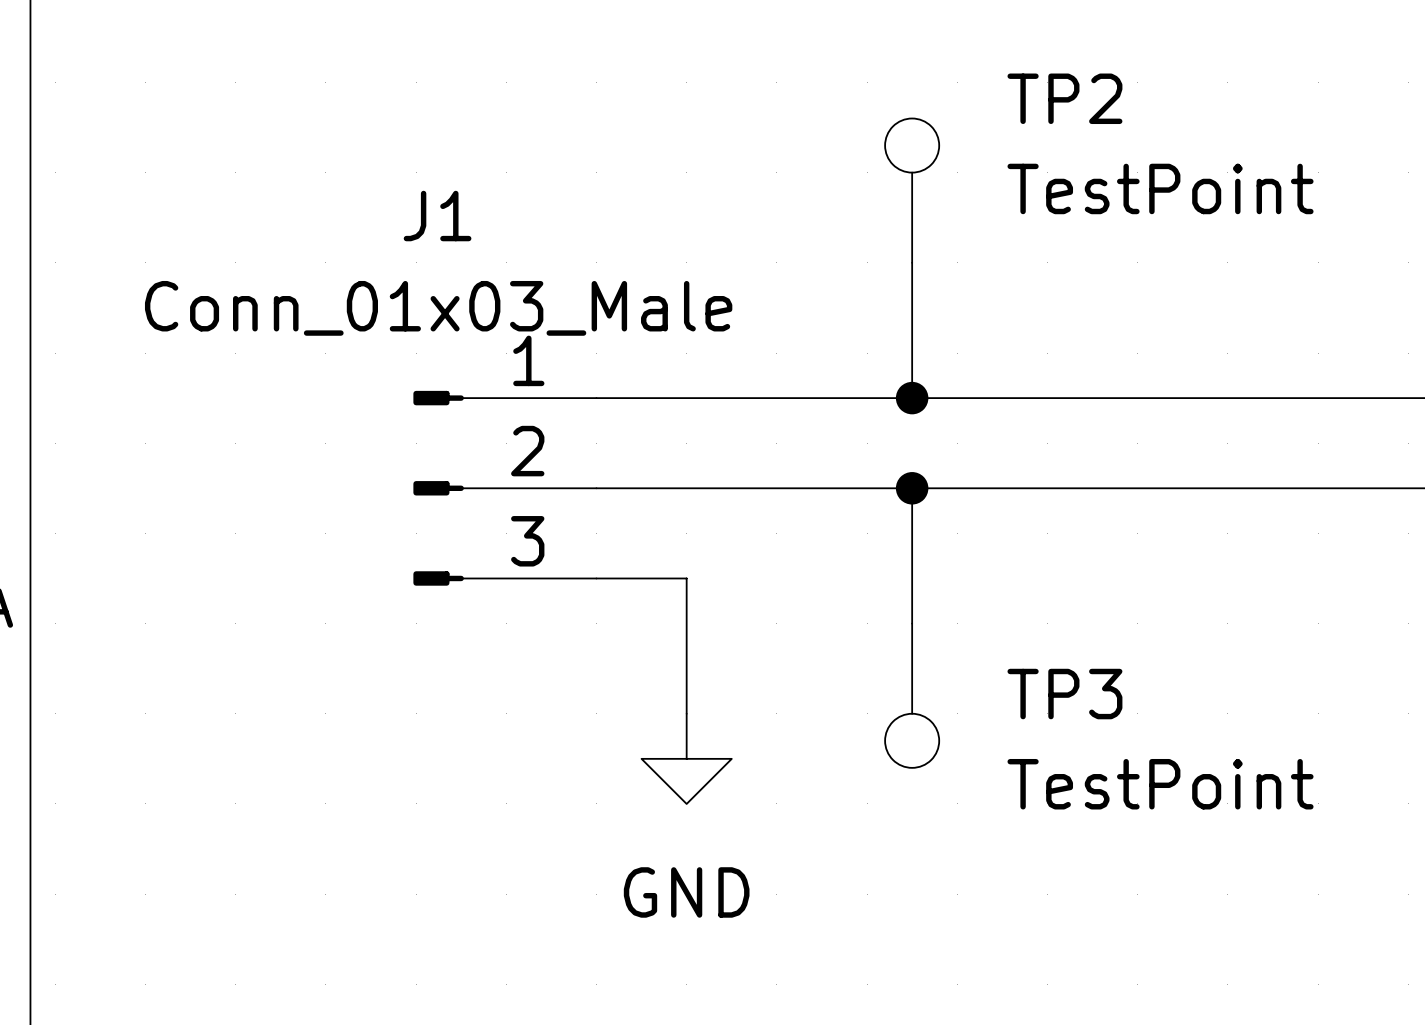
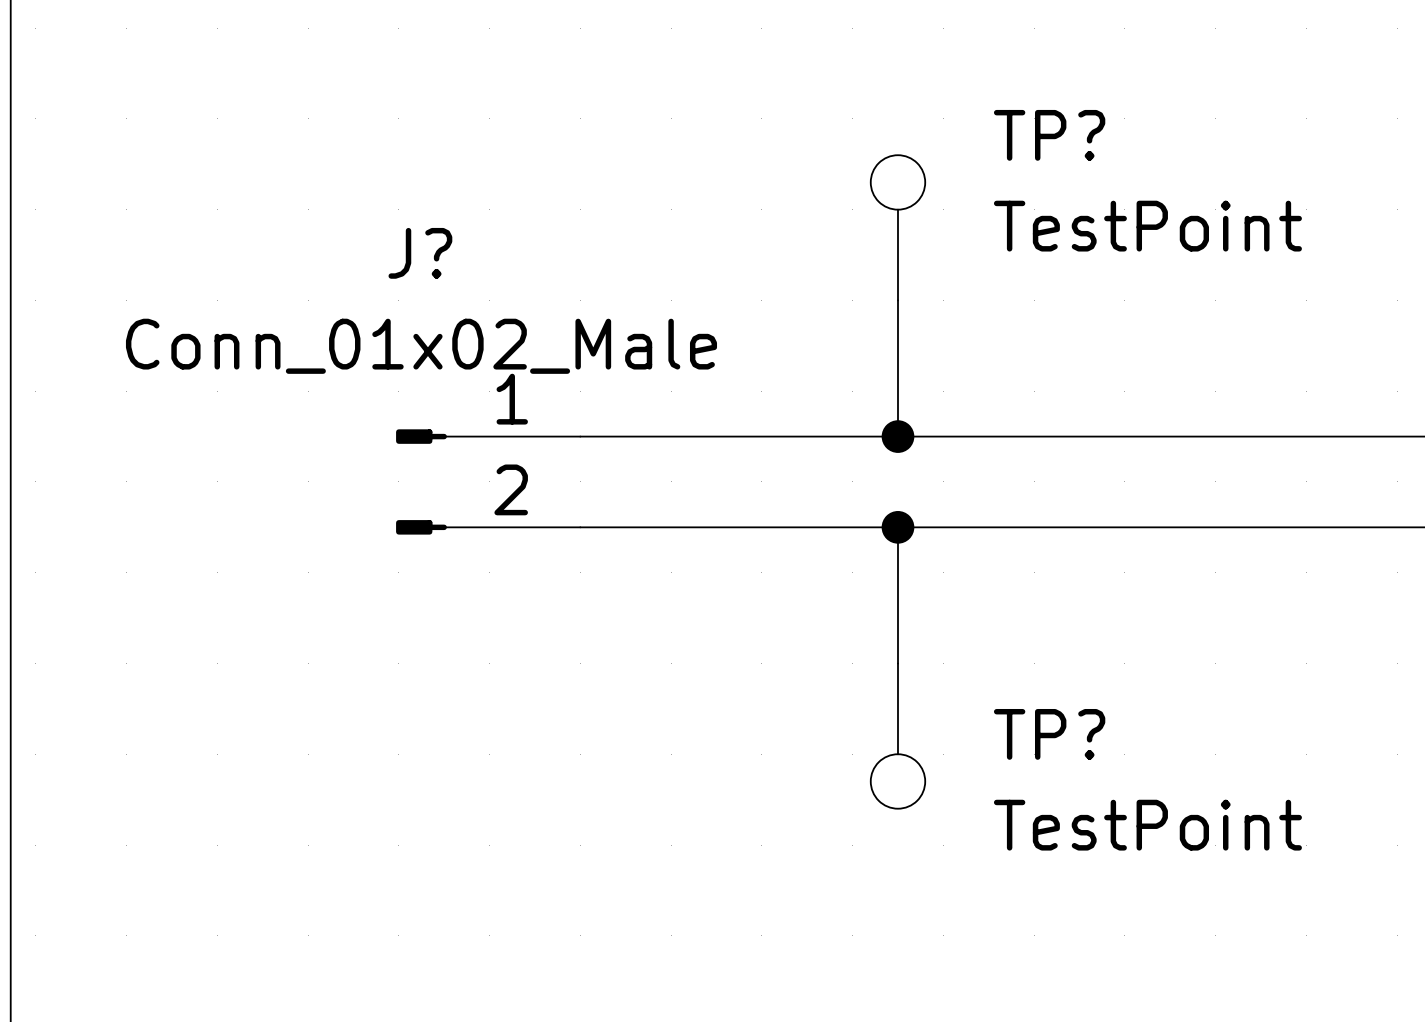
TP2 name: TP2 (1064, 98) -> TP? (1049, 135)
J?: none -> Conn_01x02_Male (488, 481)
J1: Conn_01x03_Male (504, 488) -> none
wire: (596, 578) (686, 578) (686, 713) -> none
TP3 name: TP3 (1064, 694) -> TP? (1049, 734)
power symbol: GND (686, 758) -> none

